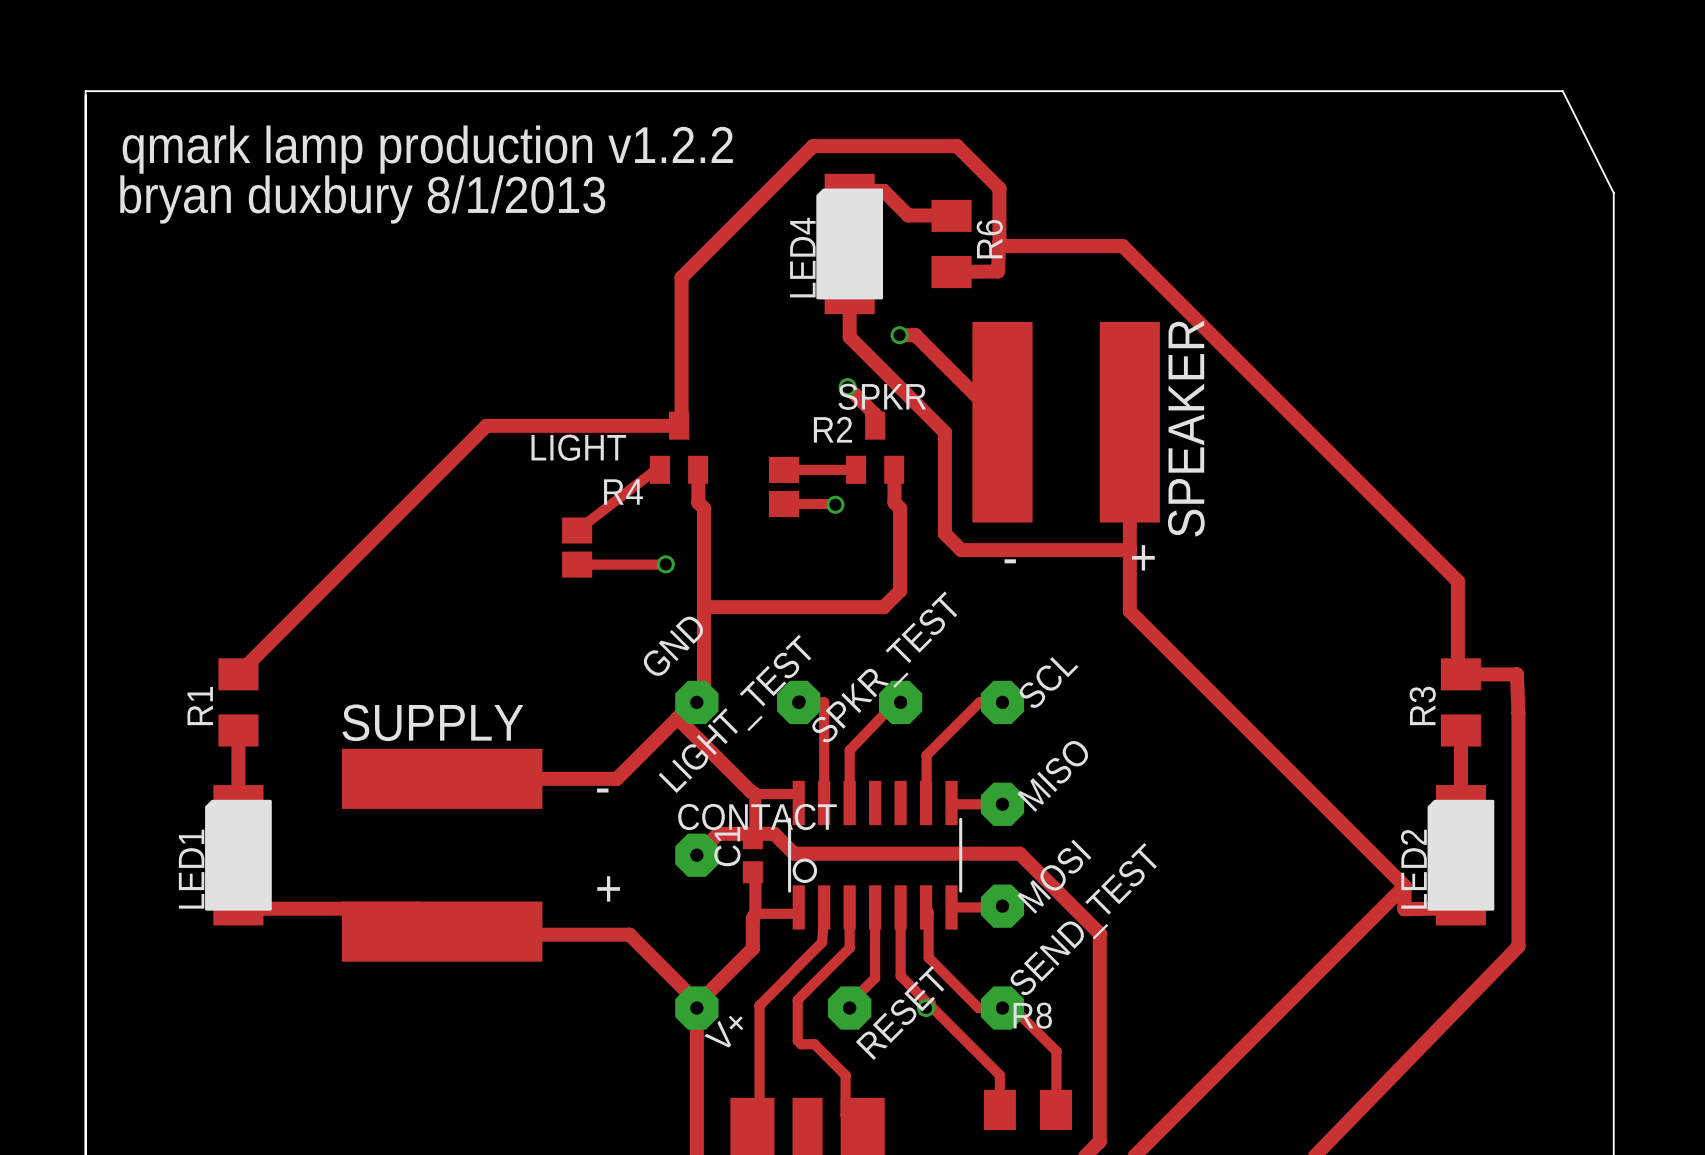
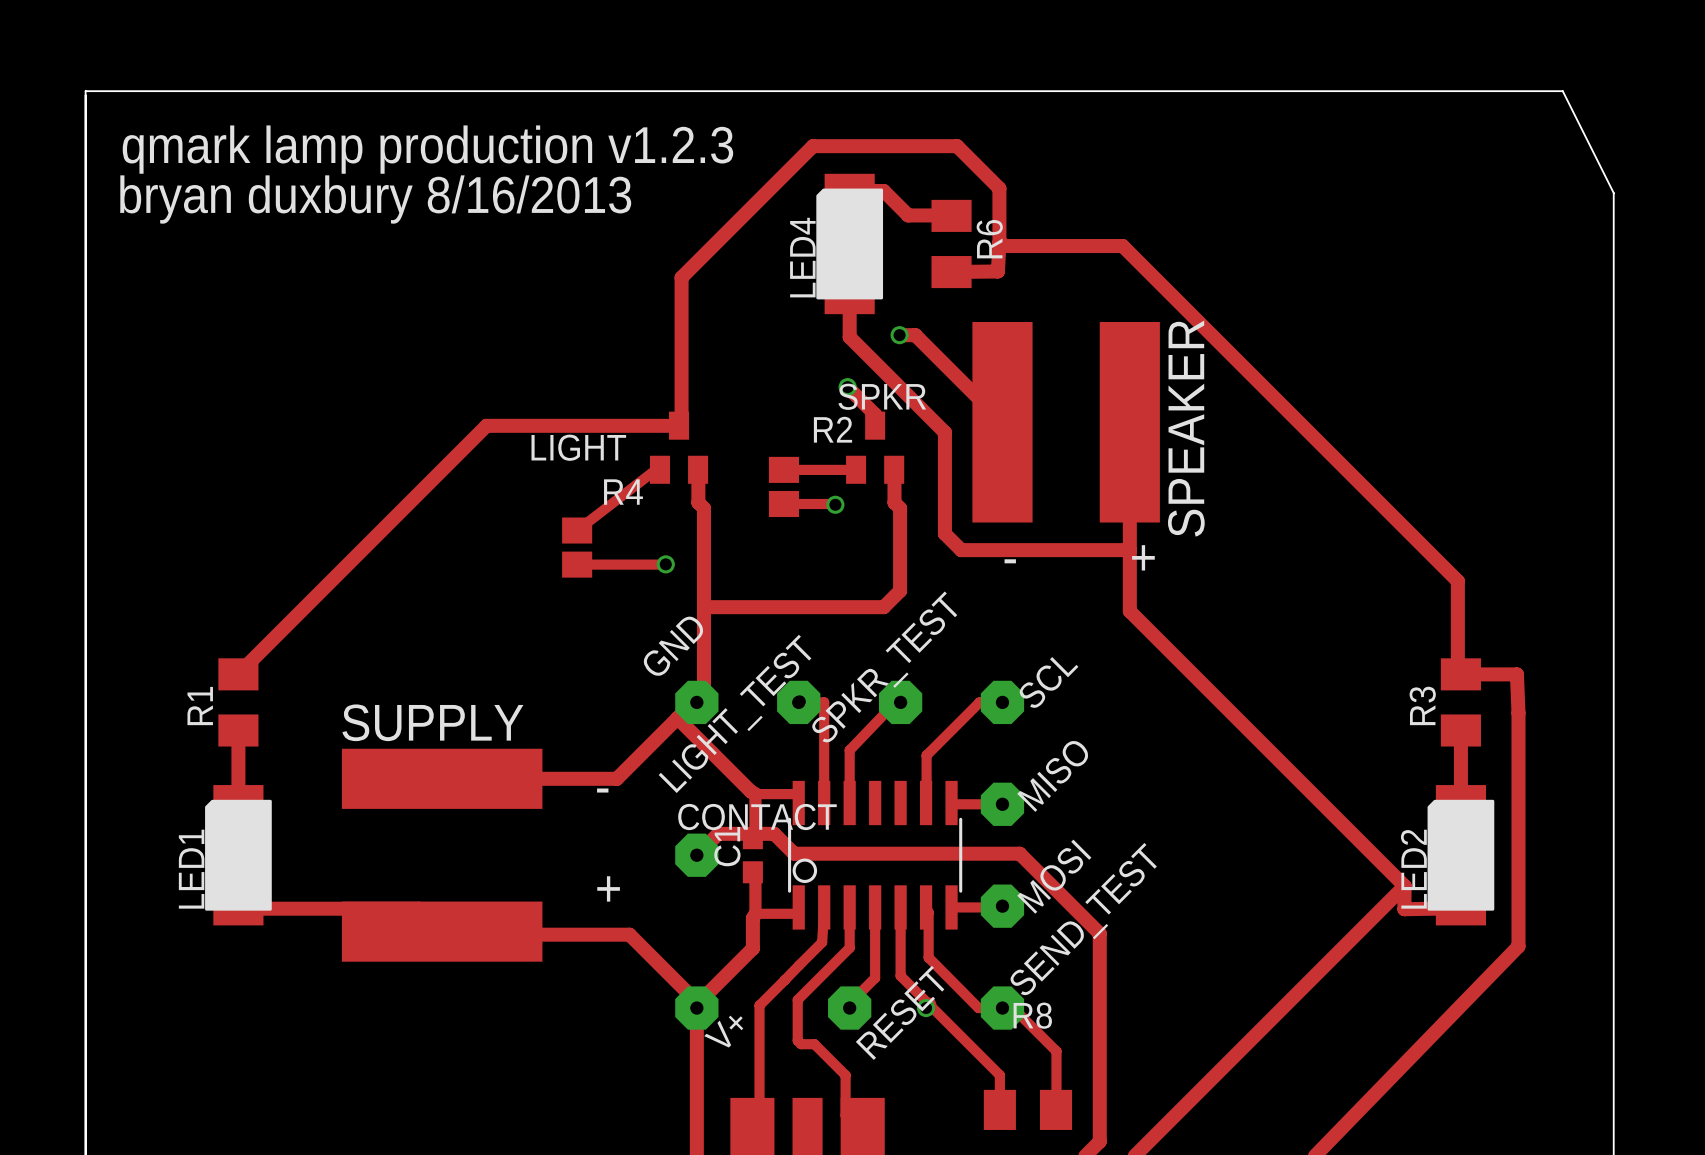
text: qmark lamp production v1.2.2 (427, 149) -> qmark lamp production v1.2.3 (427, 149)
text: bryan duxbury 8/1/2013 (362, 199) -> bryan duxbury 8/16/2013 (375, 199)

